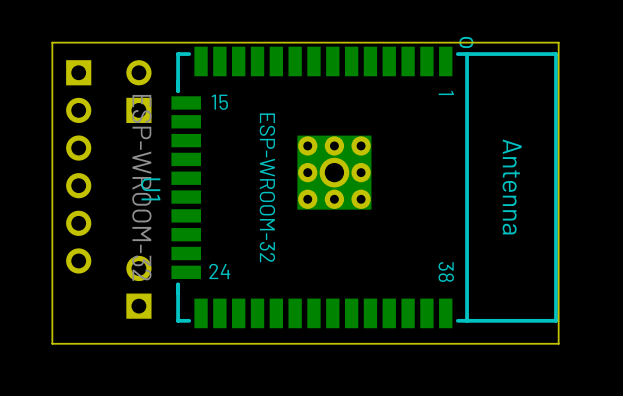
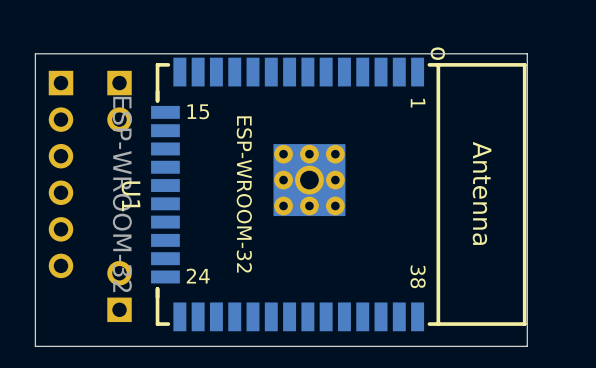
part rotation: 0° (138, 91) -> 180° (119, 101)

